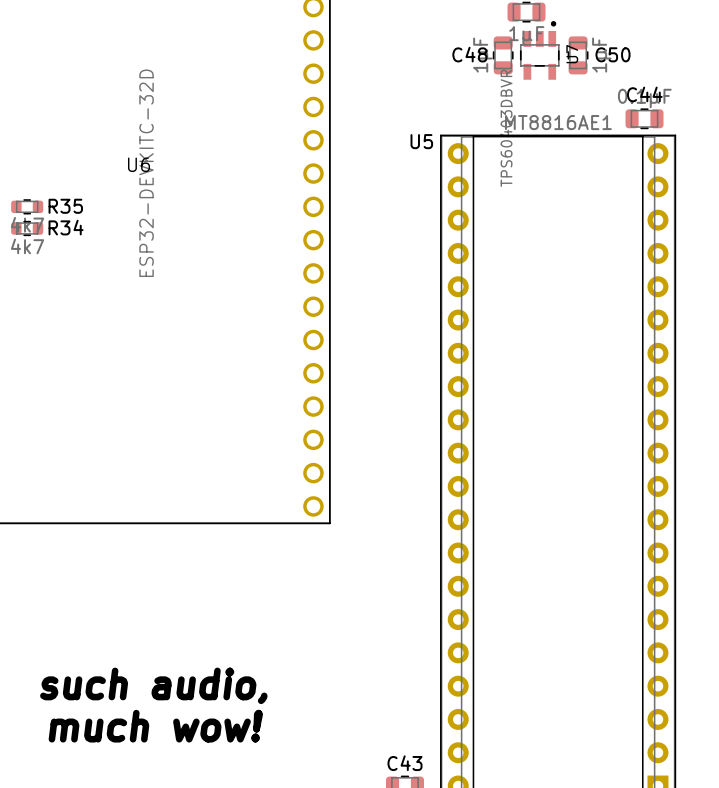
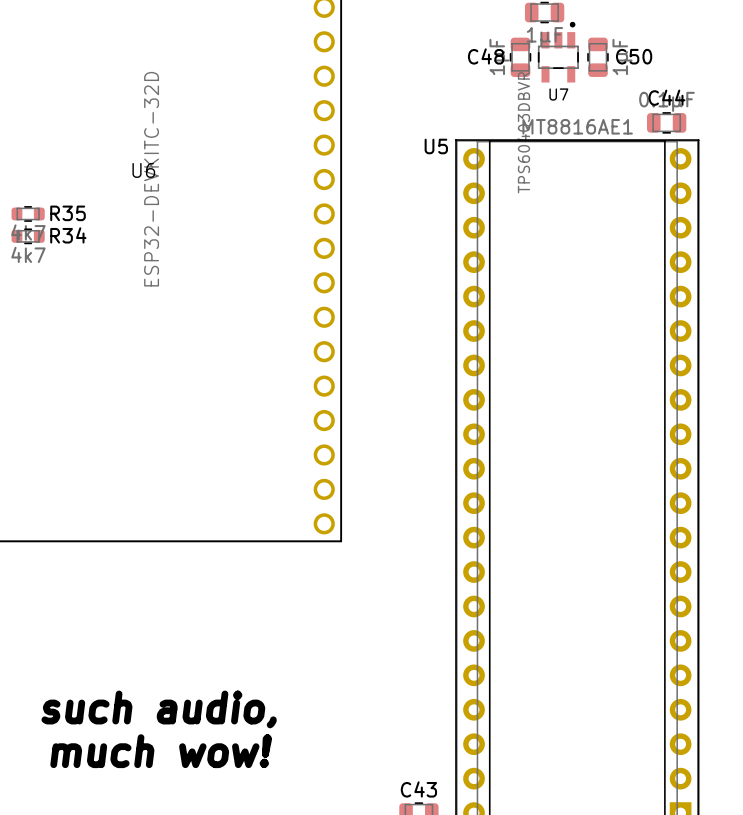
U7 name rotation: 0° (572, 54) -> 90° clockwise (558, 94)
U7 name position: U7 (572, 54) -> U7 (558, 94)

